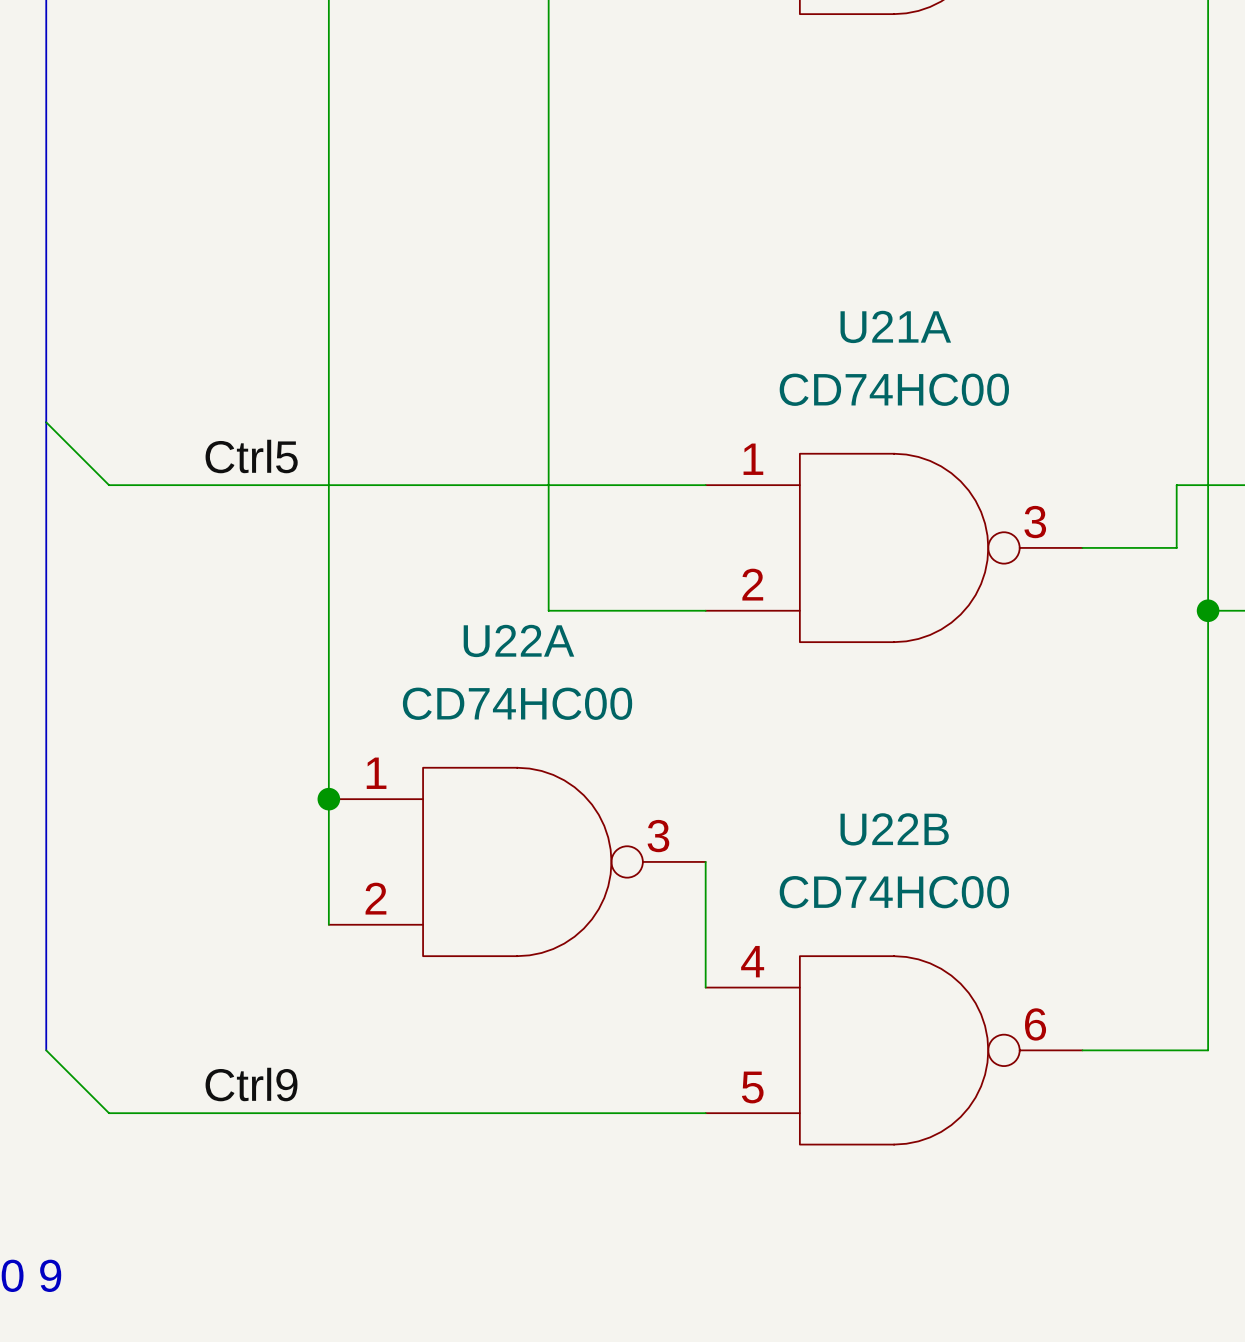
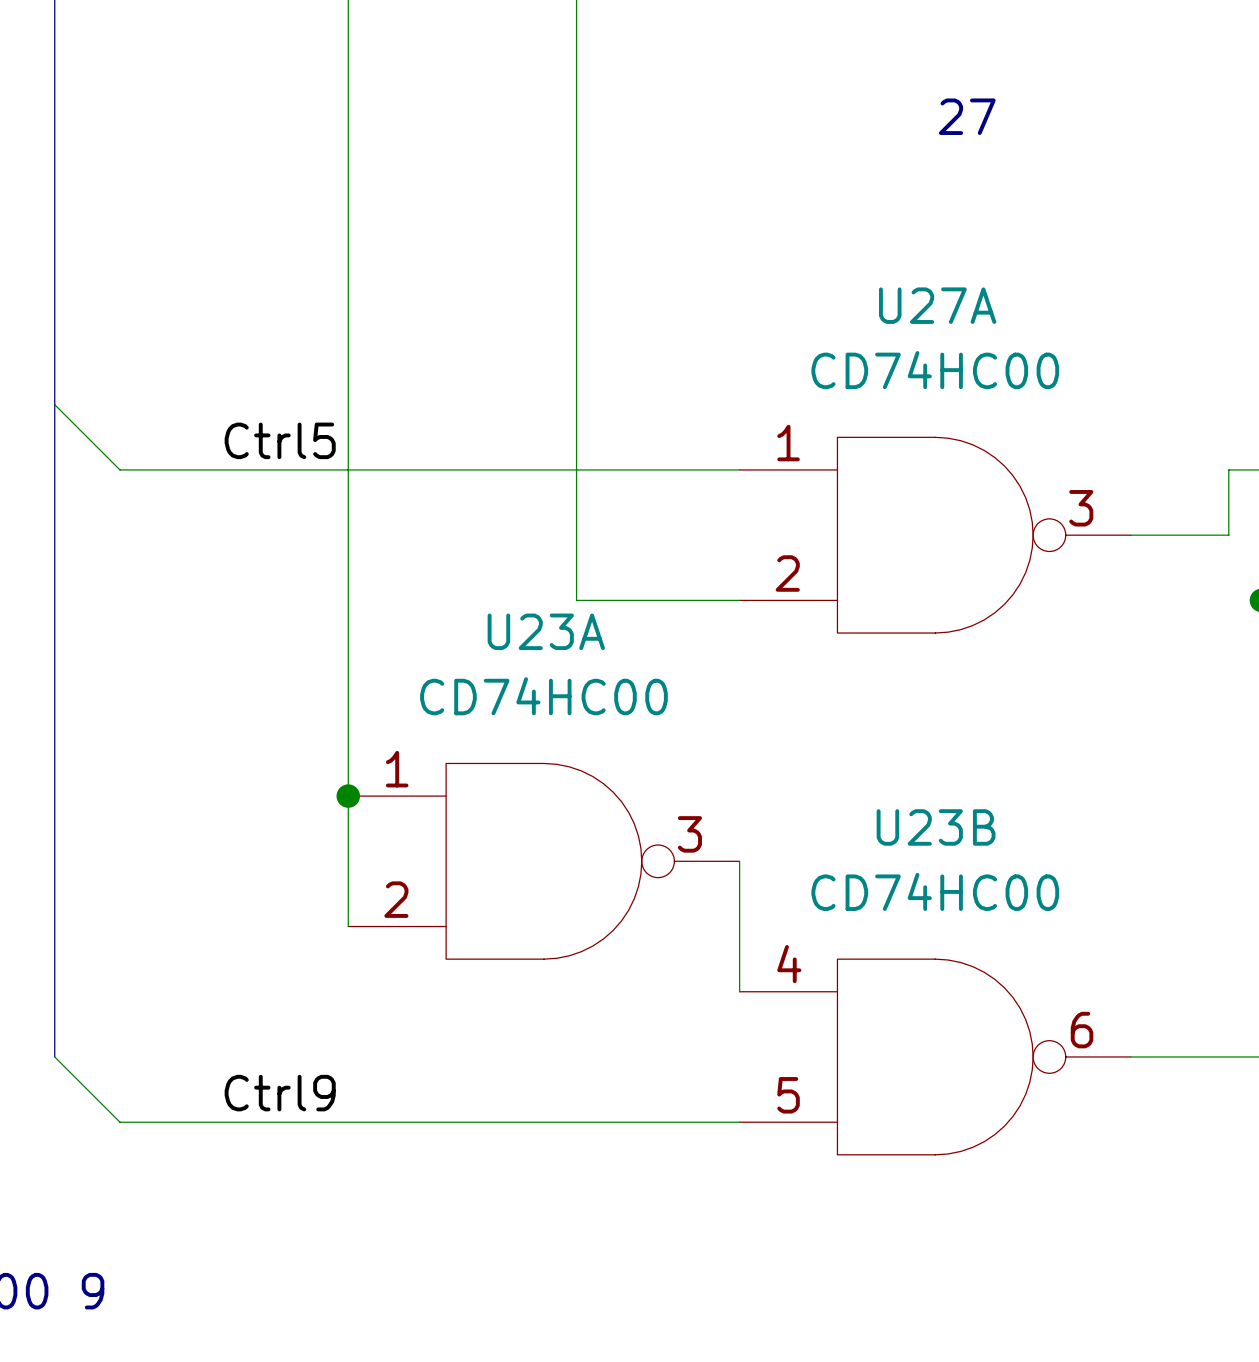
text: none -> 27 (967, 116)
U21A name: U21A (895, 326) -> U27A (937, 305)
U22A name: U22A (518, 640) -> U23A (546, 631)
U22B name: U22B (894, 829) -> U23B (936, 827)

